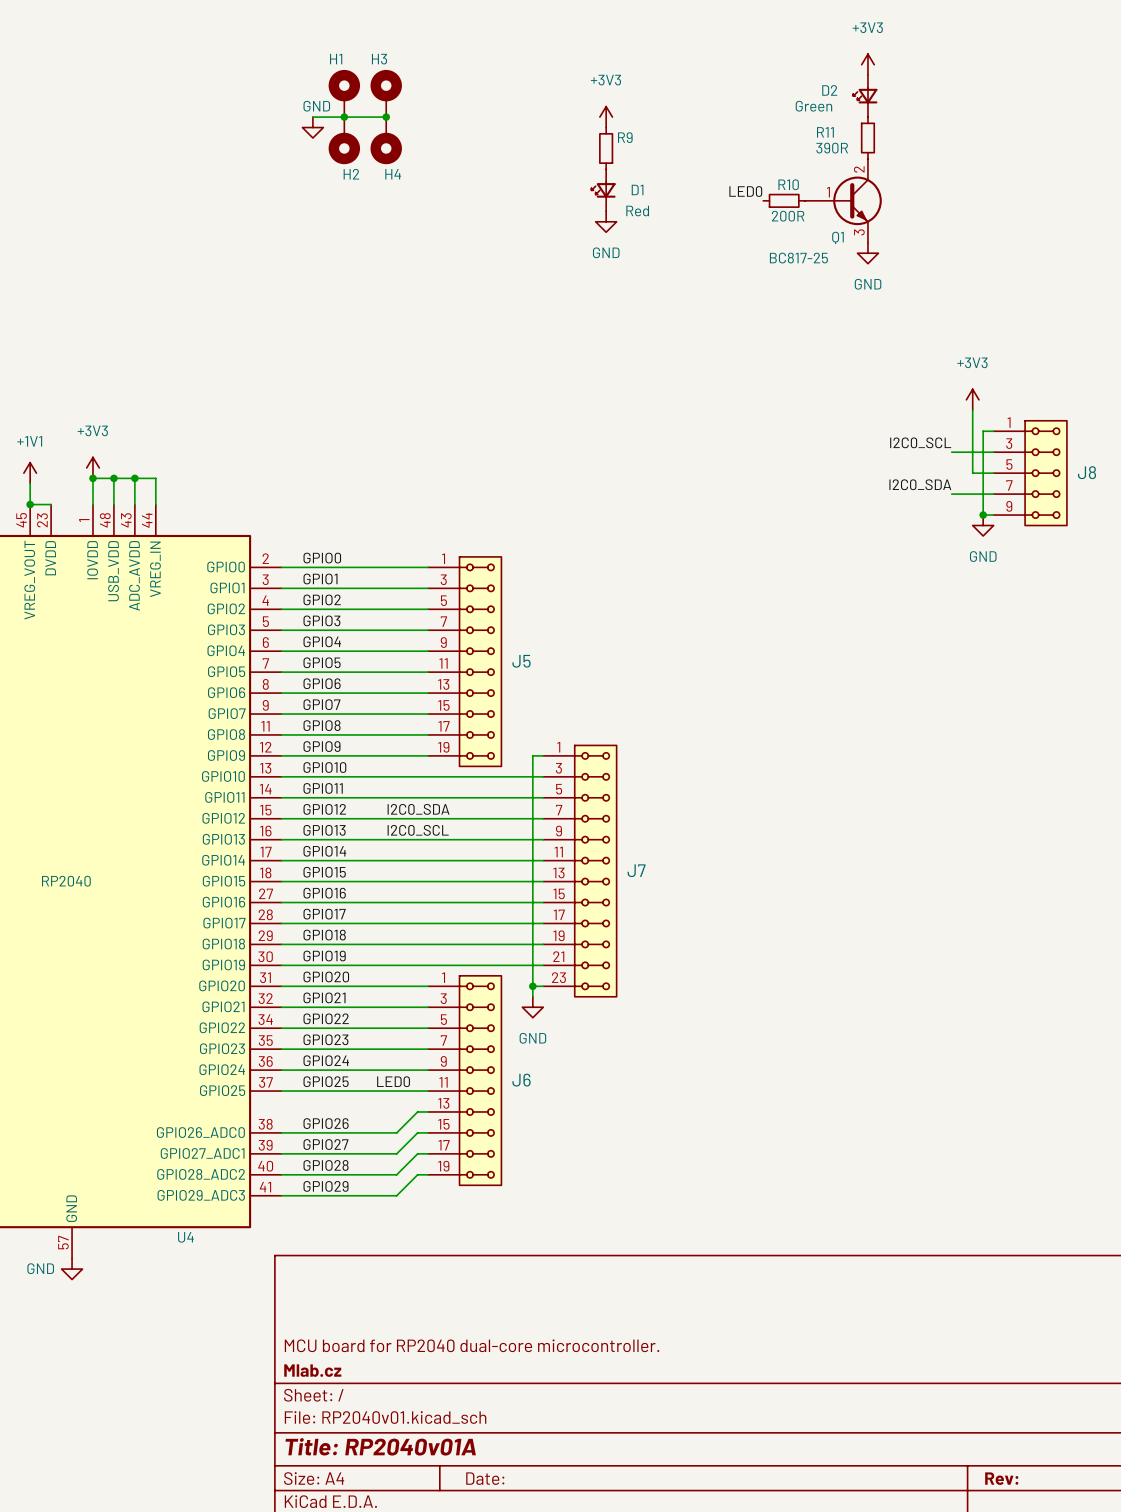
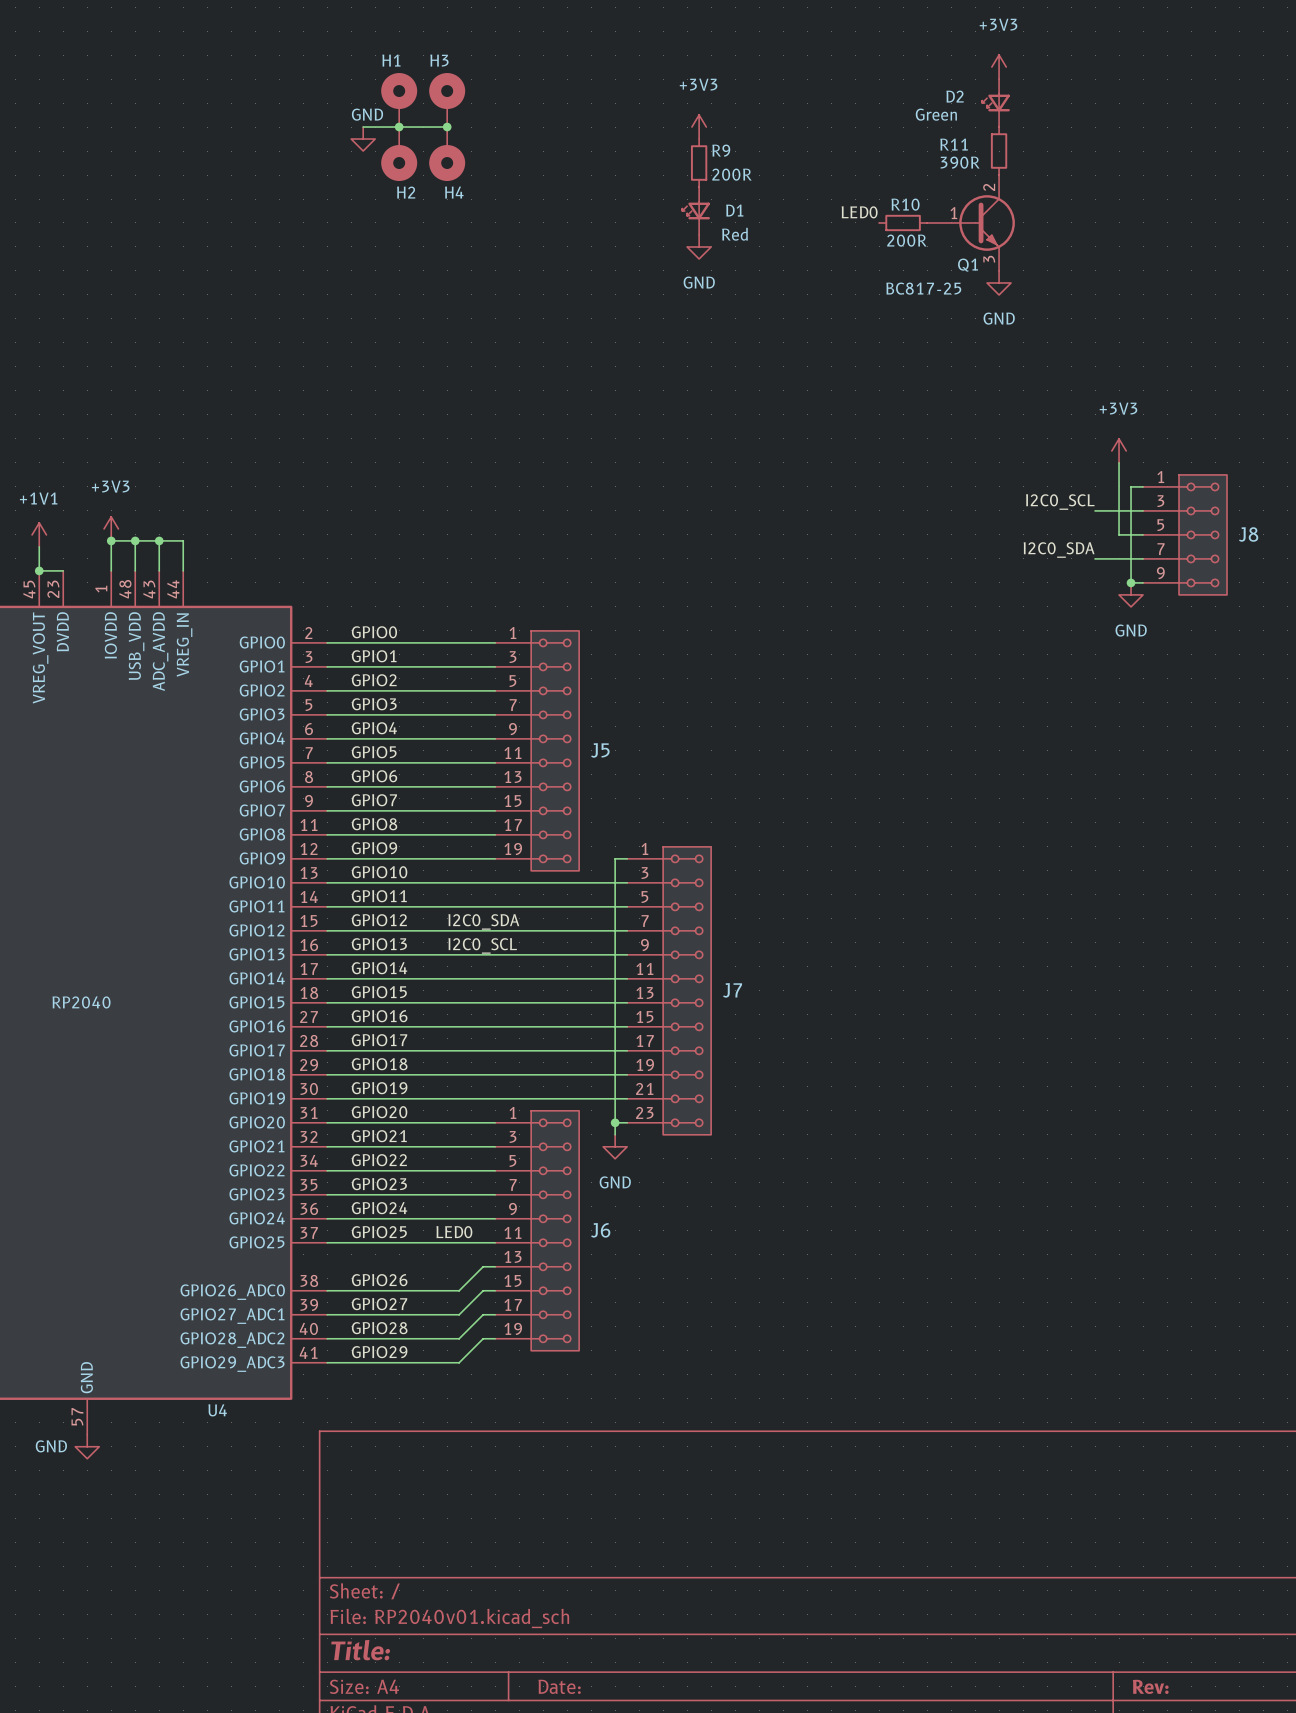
R9 value: none -> 200R (731, 174)
title block: MCU board for RP2040 dual-core microcontroller. (472, 1345) -> none
title block: Mlab.cz (312, 1370) -> none
title block: Title: RP2040v01A (380, 1446) -> Title: (360, 1650)

